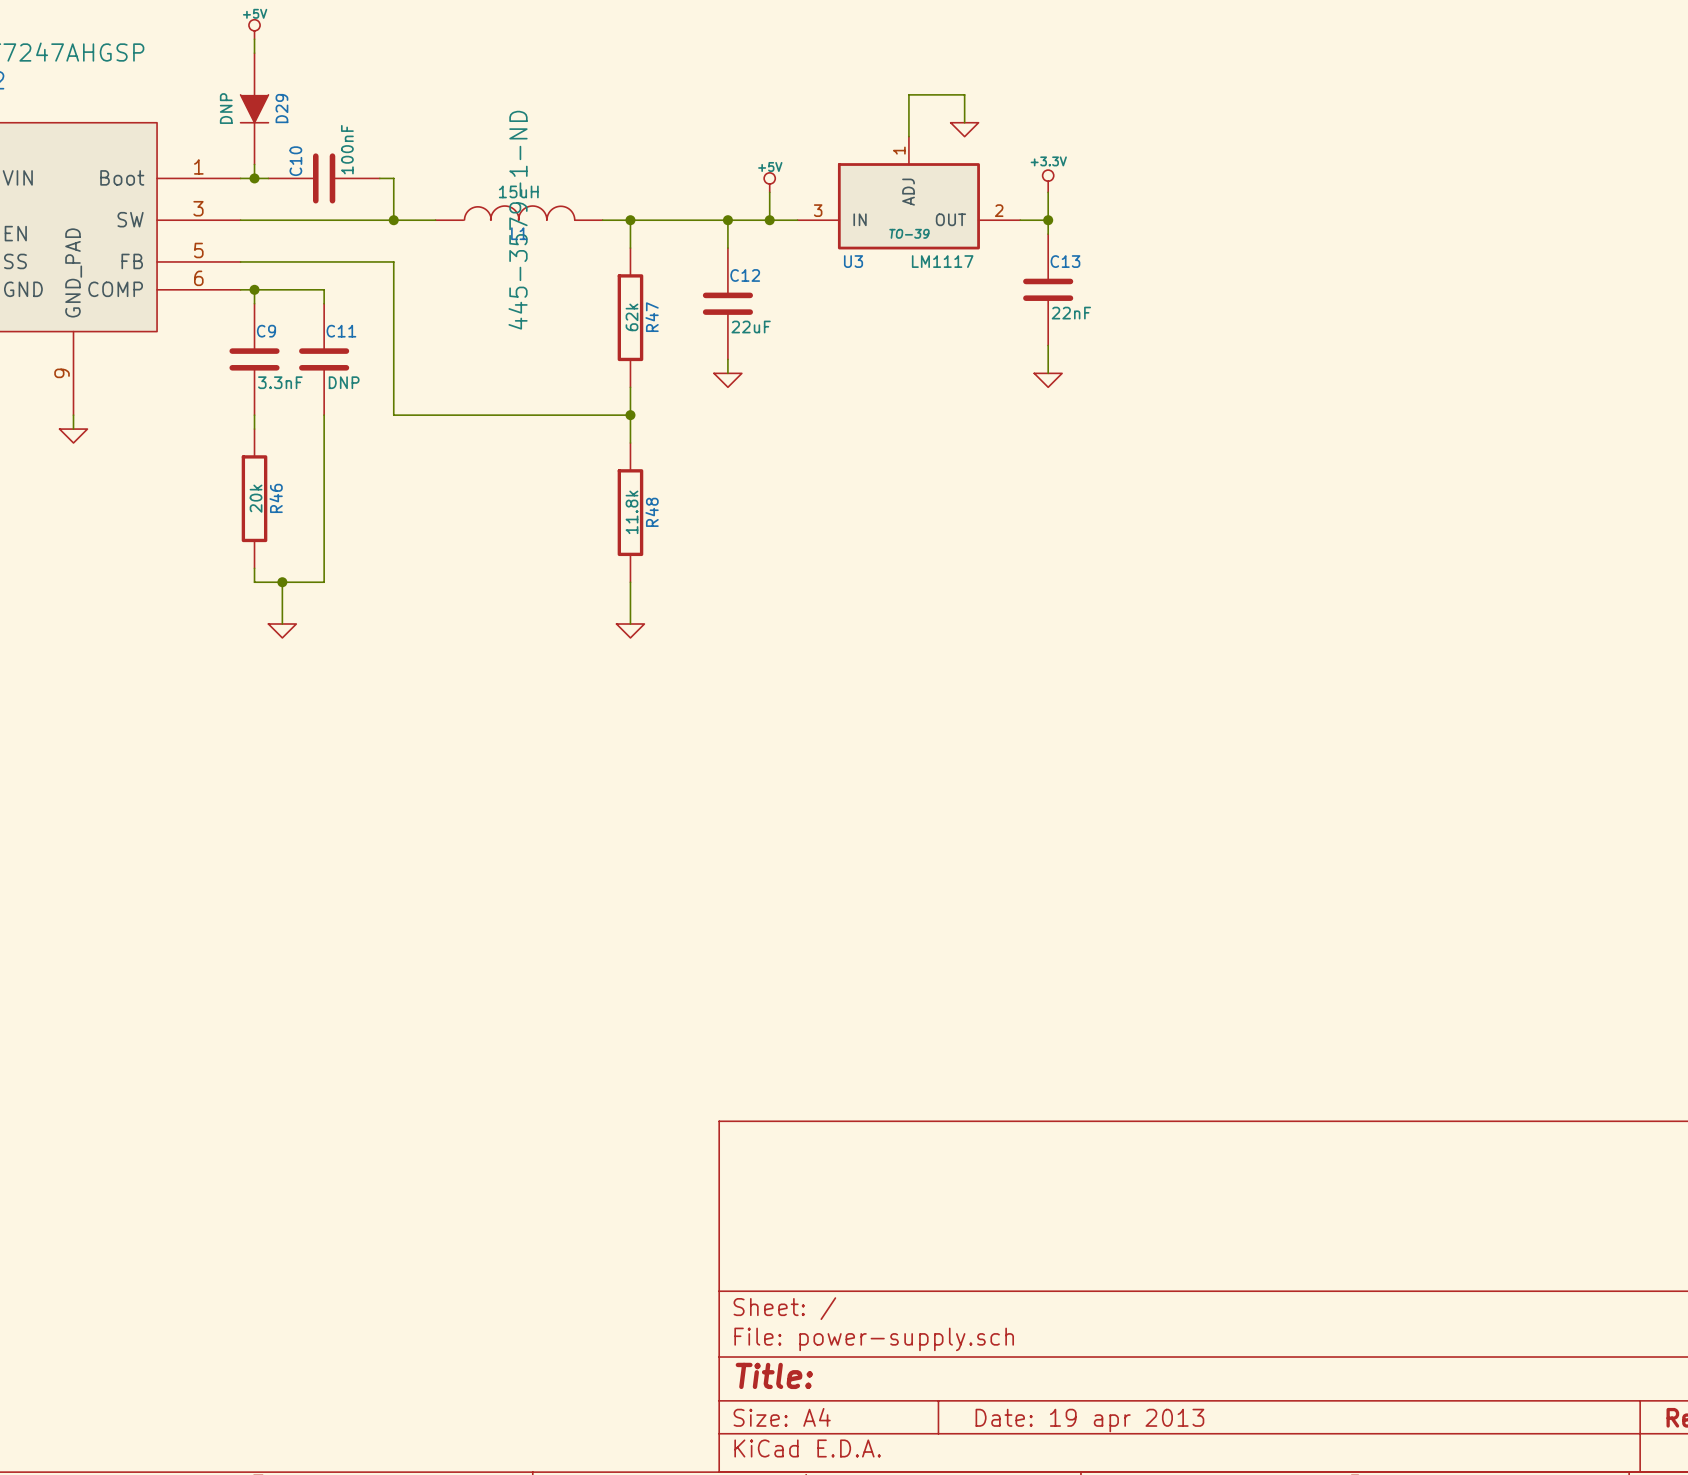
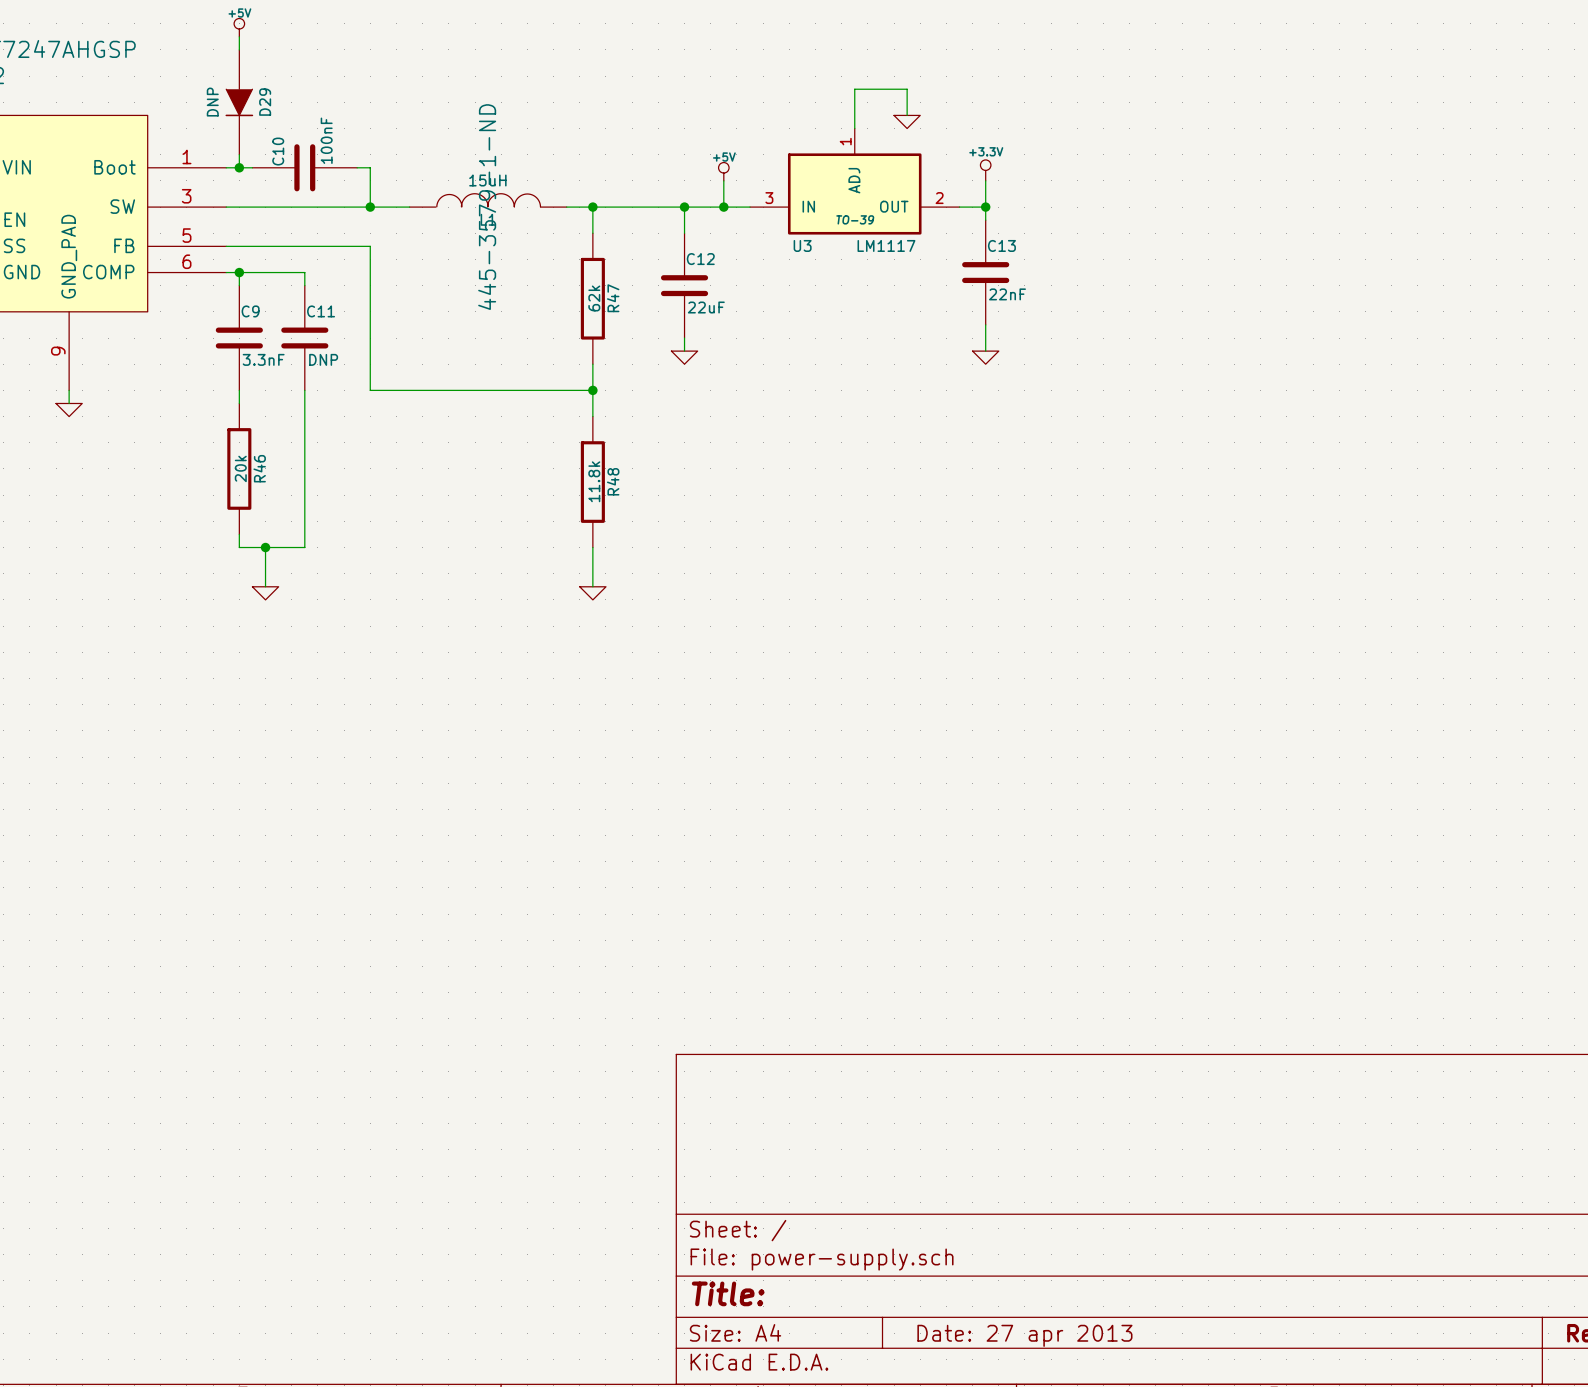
title block: Date: 19 apr 2013 (1089, 1420) -> Date: 27 apr 2013 (1024, 1335)

